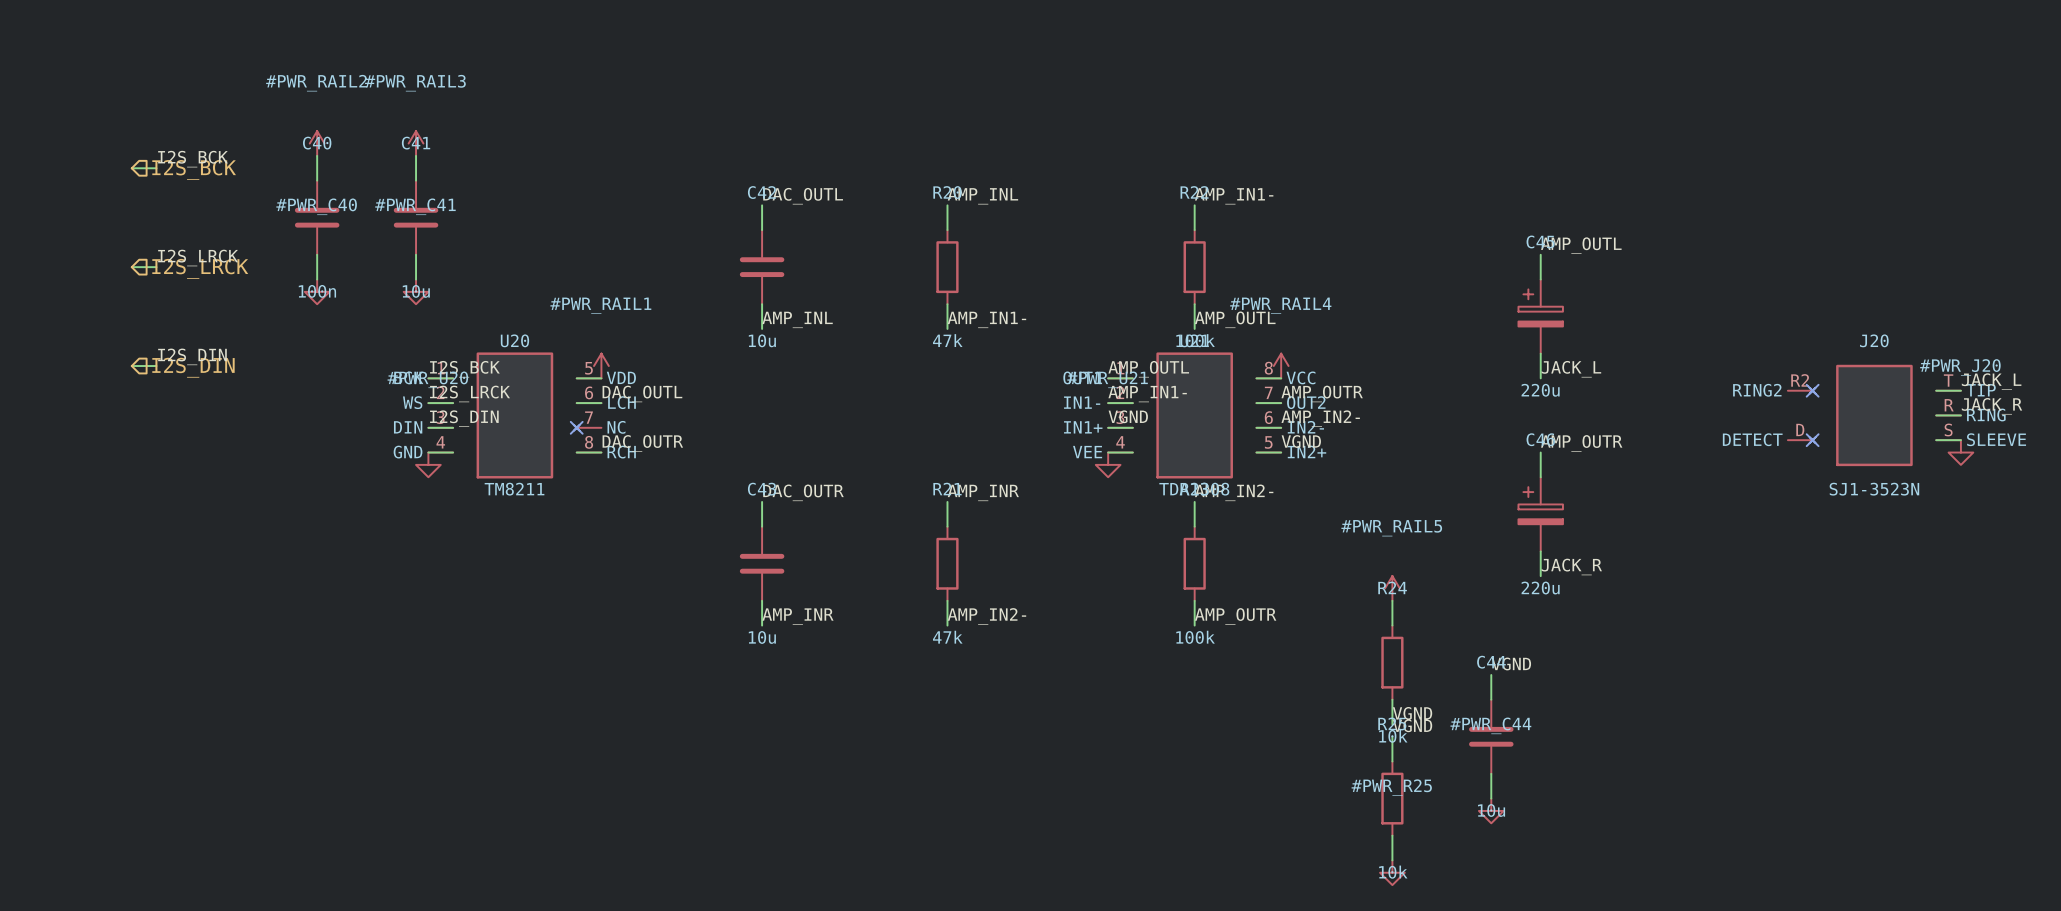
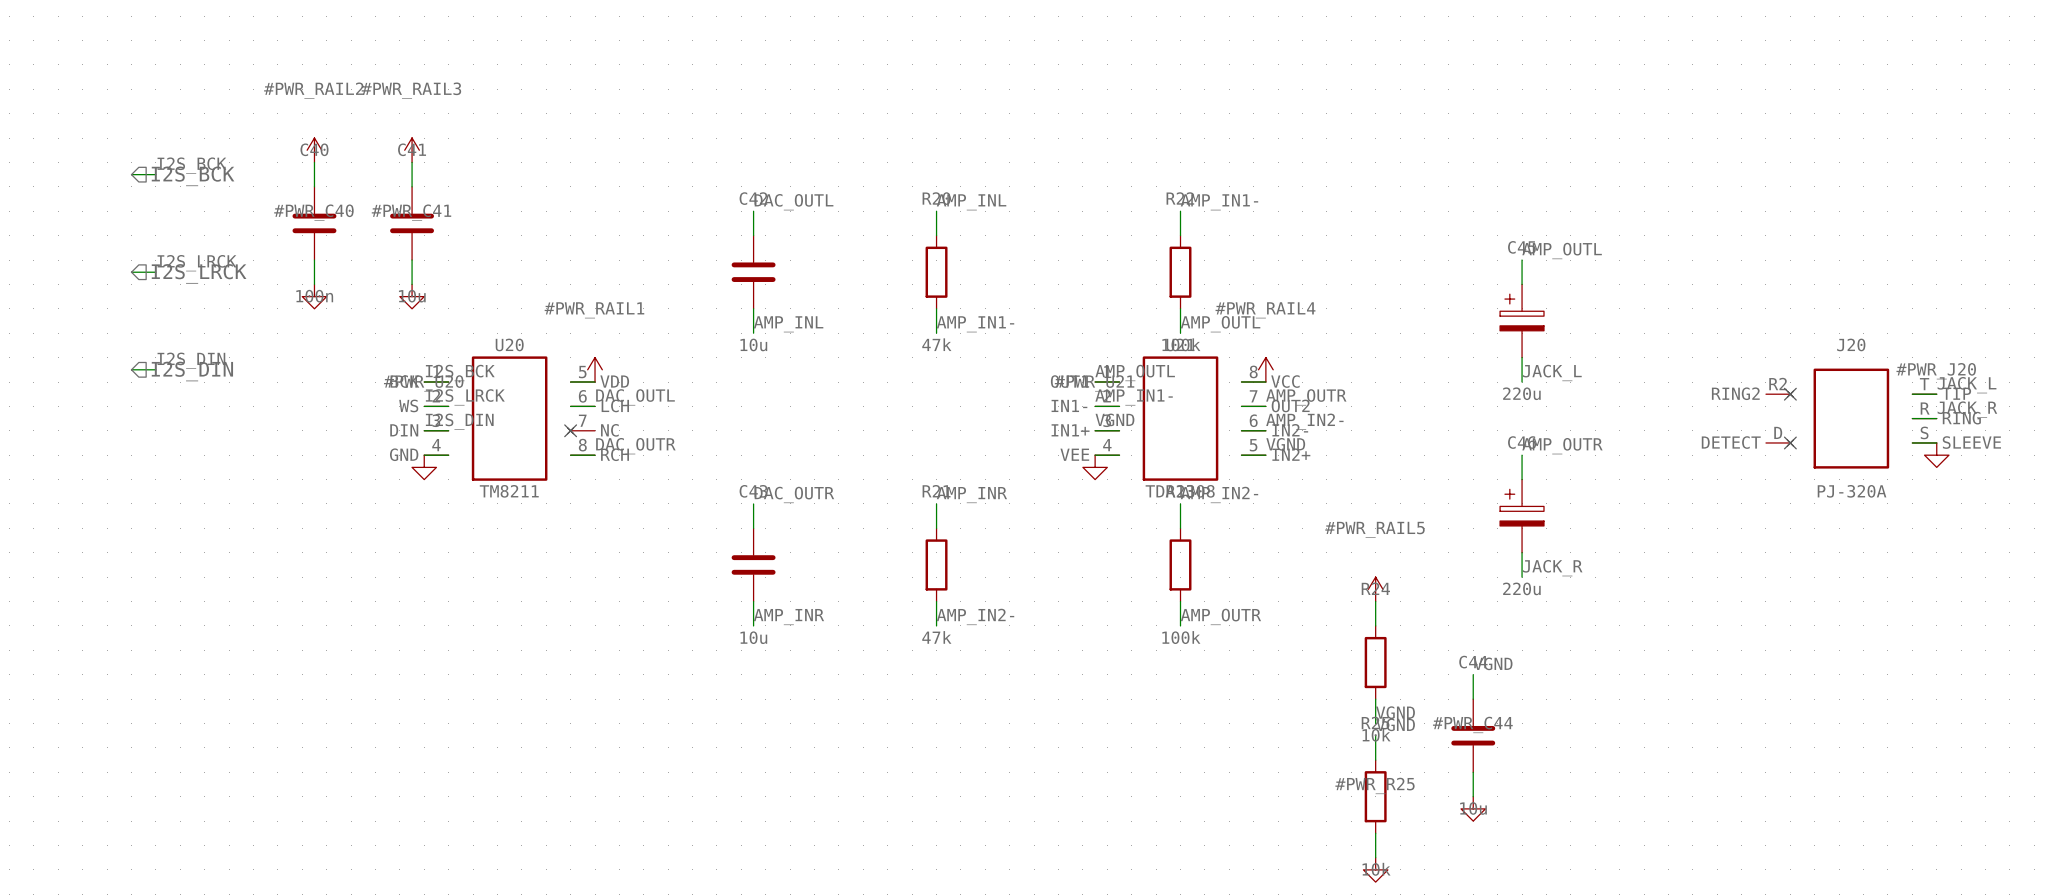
J20 value: SJ1-3523N (1874, 489) -> PJ-320A (1852, 491)

